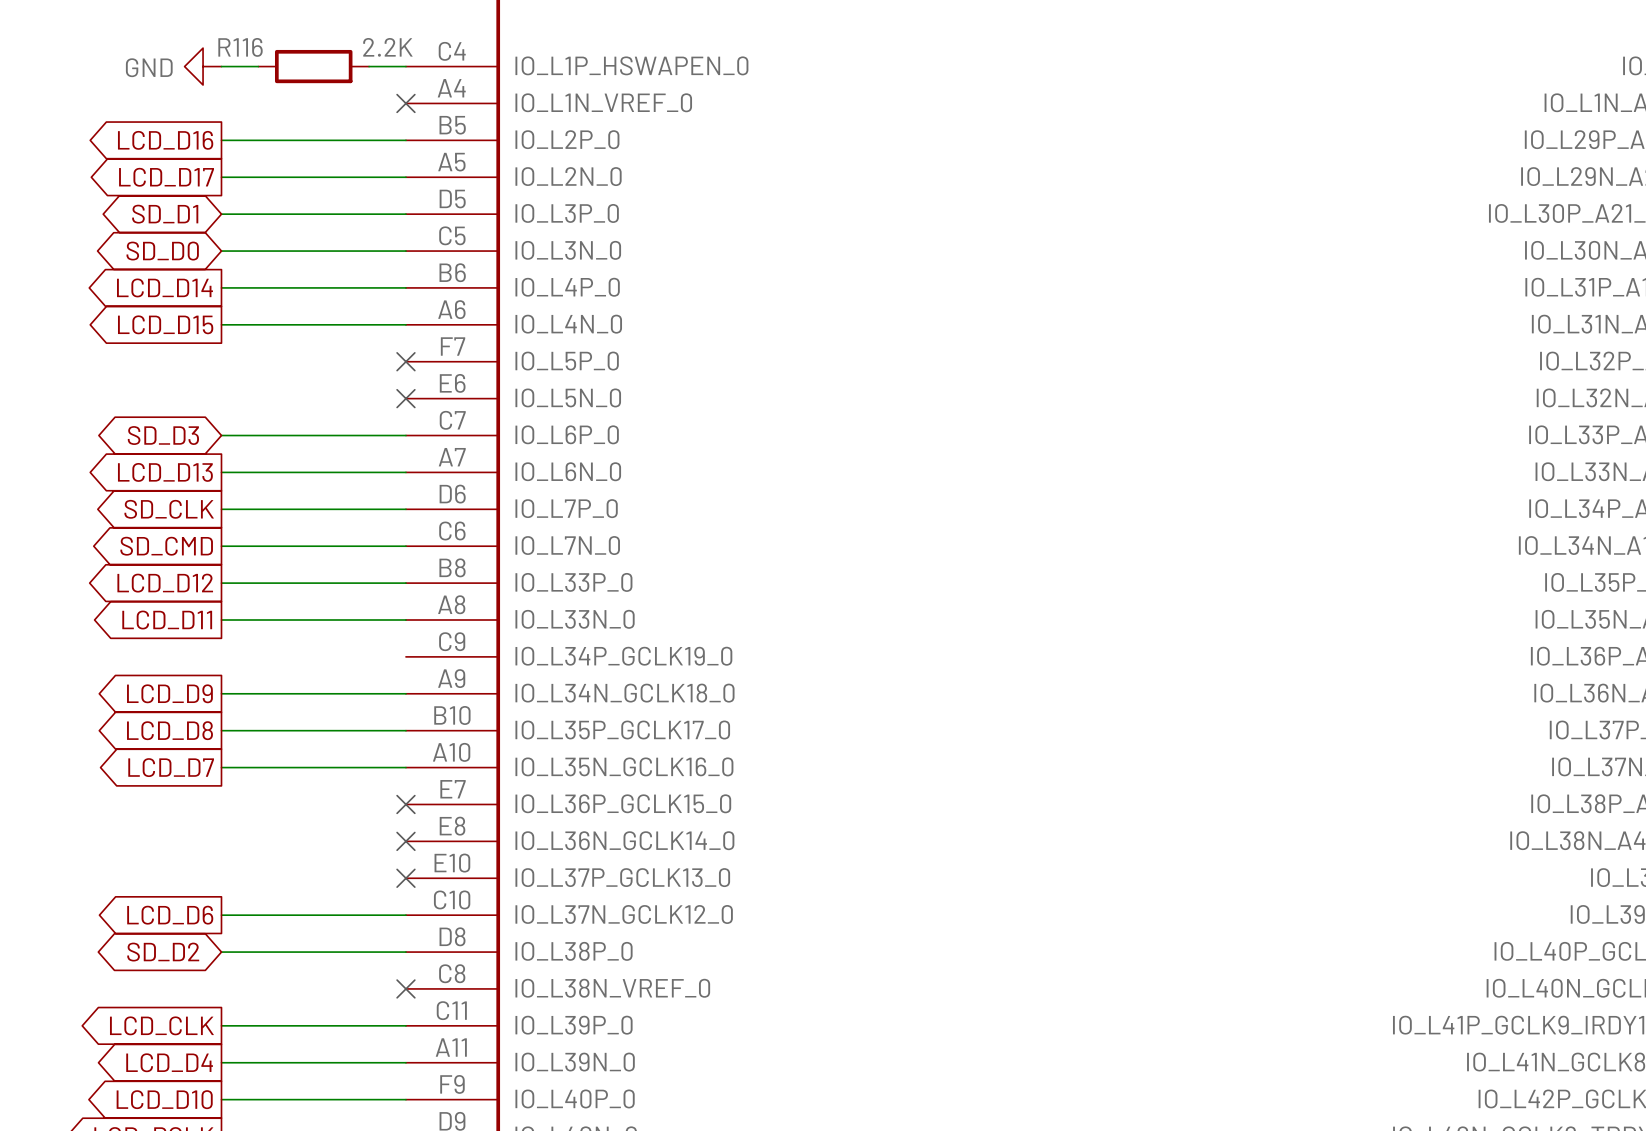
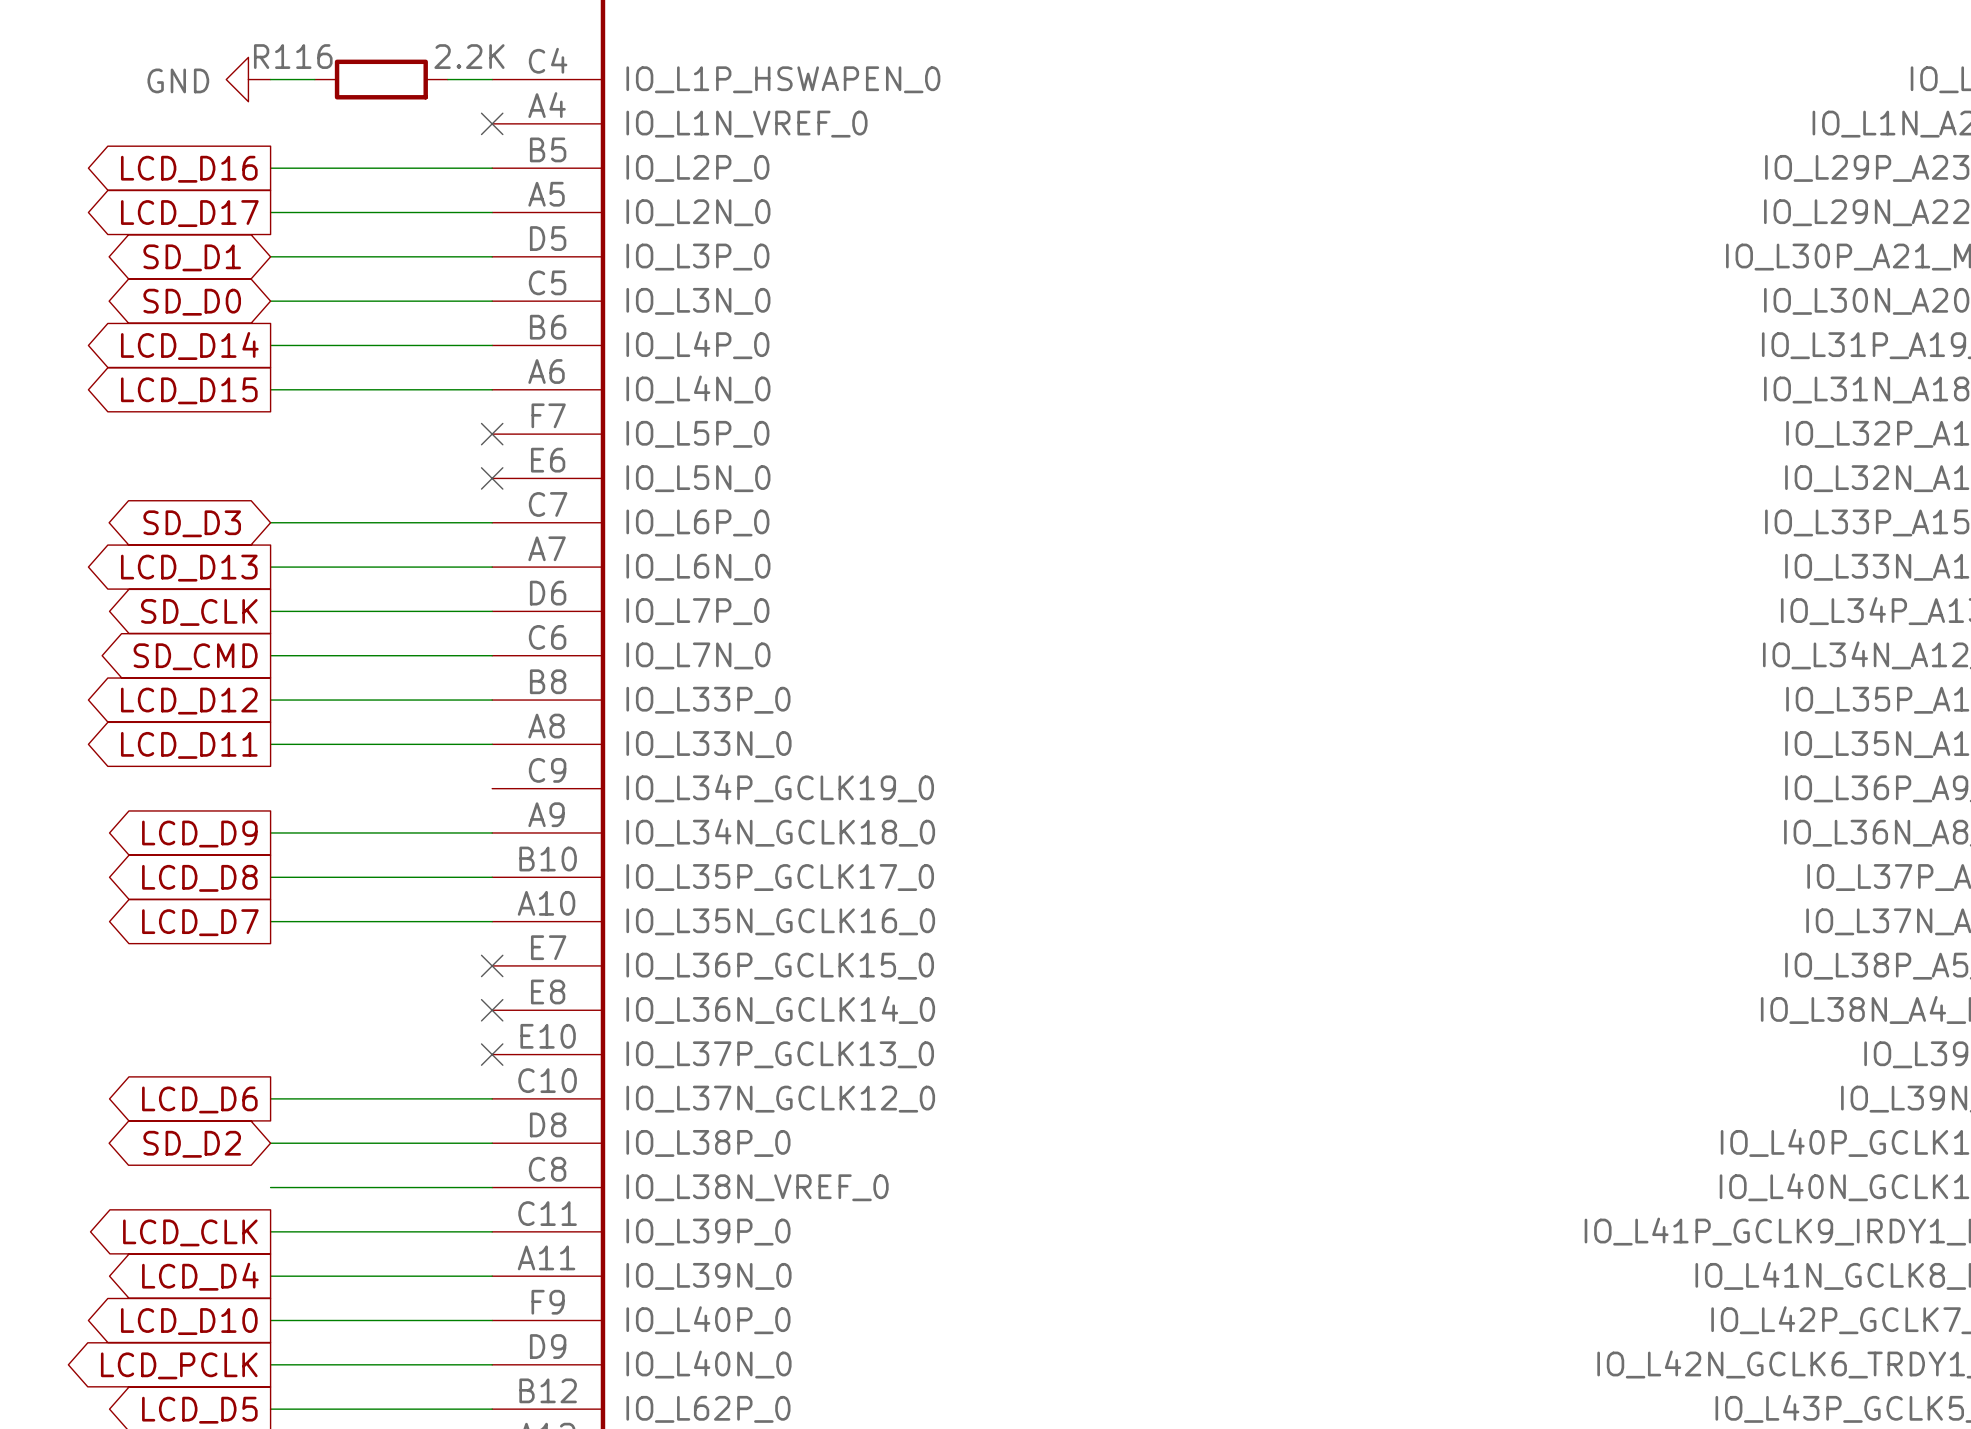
wire: none -> (270, 1187) (492, 1187)
no-connect mark: (405, 988) -> none

